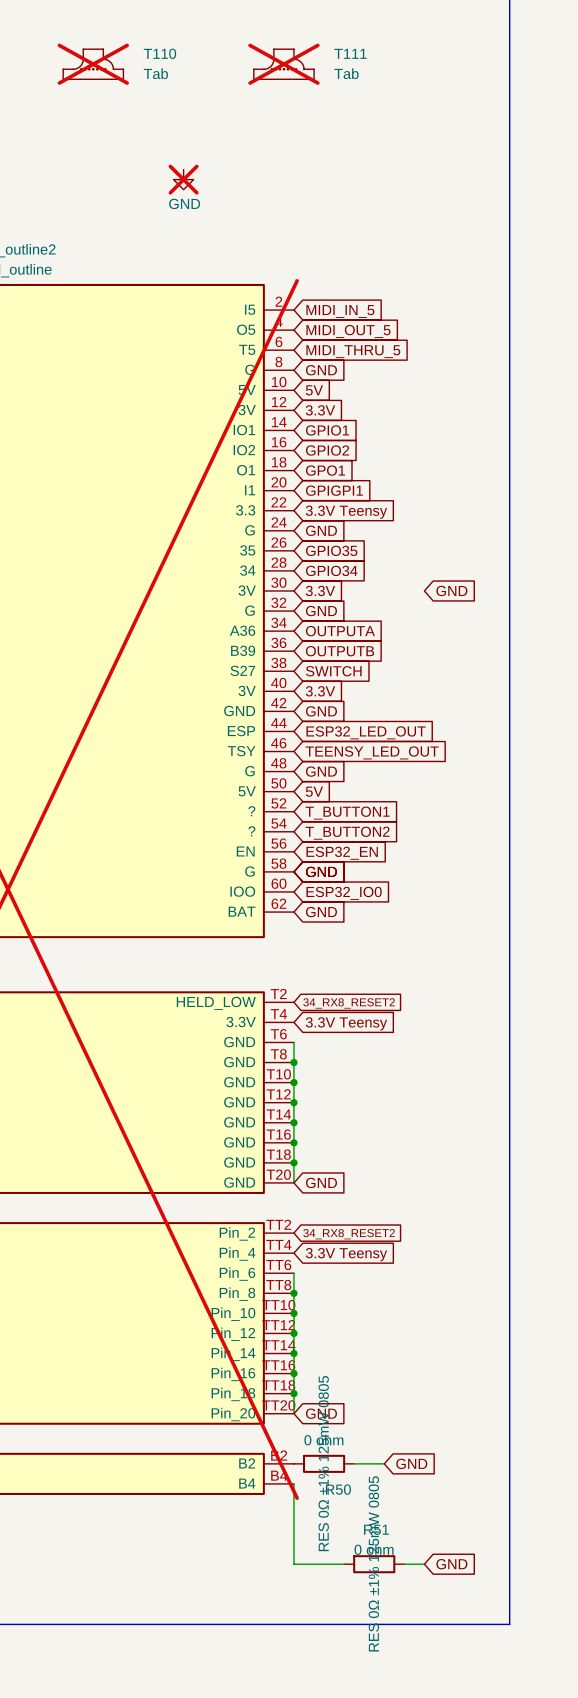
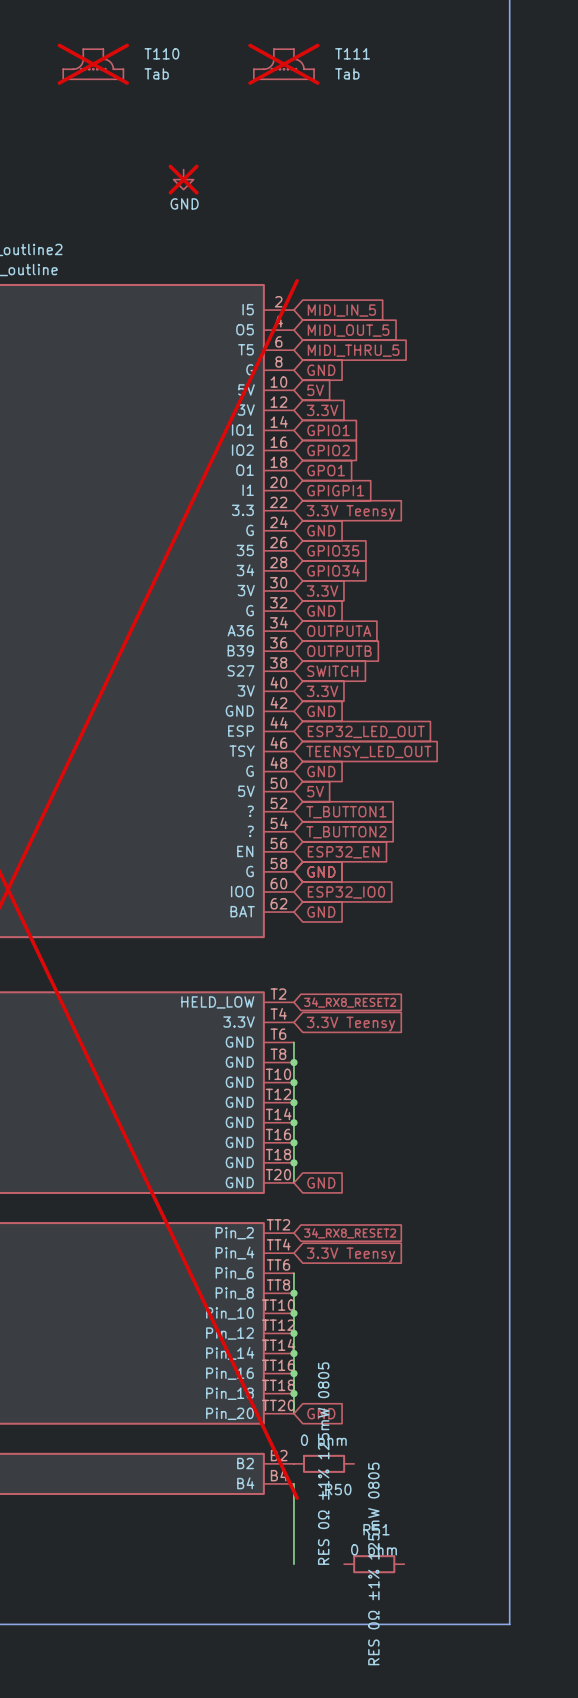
global label: GND (451, 590) -> none
wire: (354, 1463) (384, 1463) -> none
global label: GND (411, 1463) -> none
wire: (293, 1564) (344, 1564) -> none
wire: (404, 1564) (424, 1564) -> none
global label: GND (451, 1564) -> none

